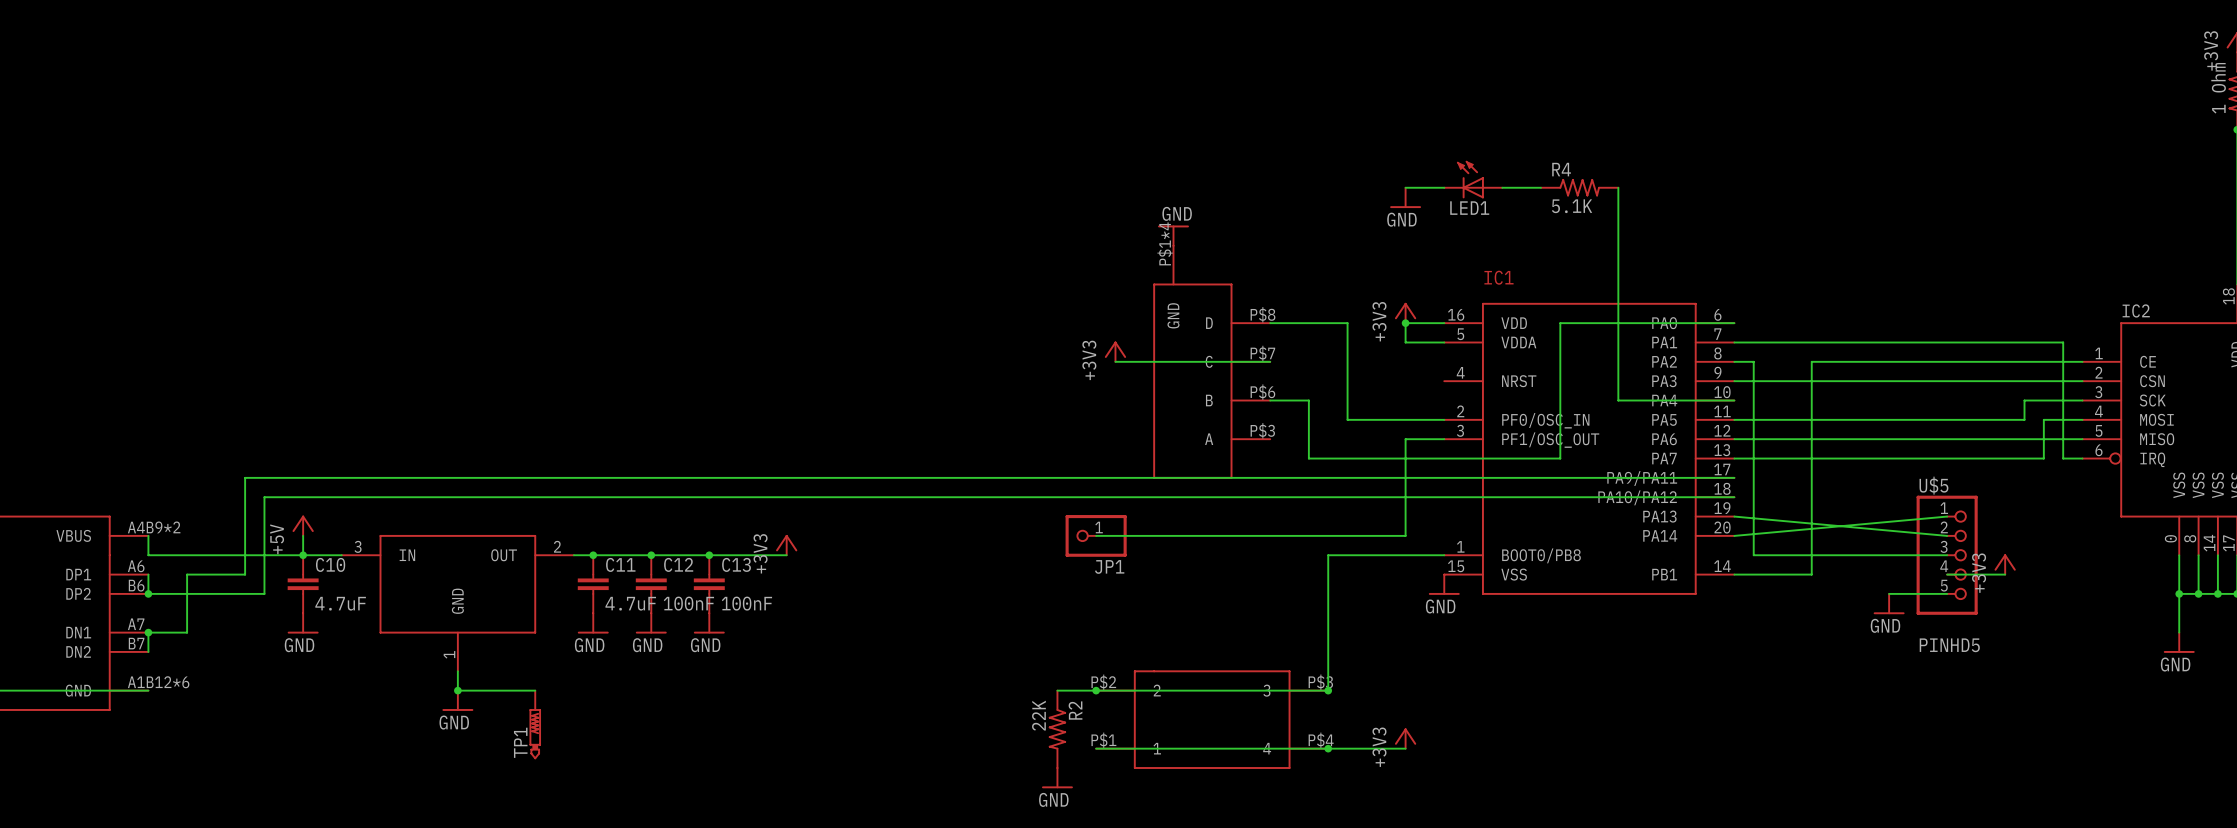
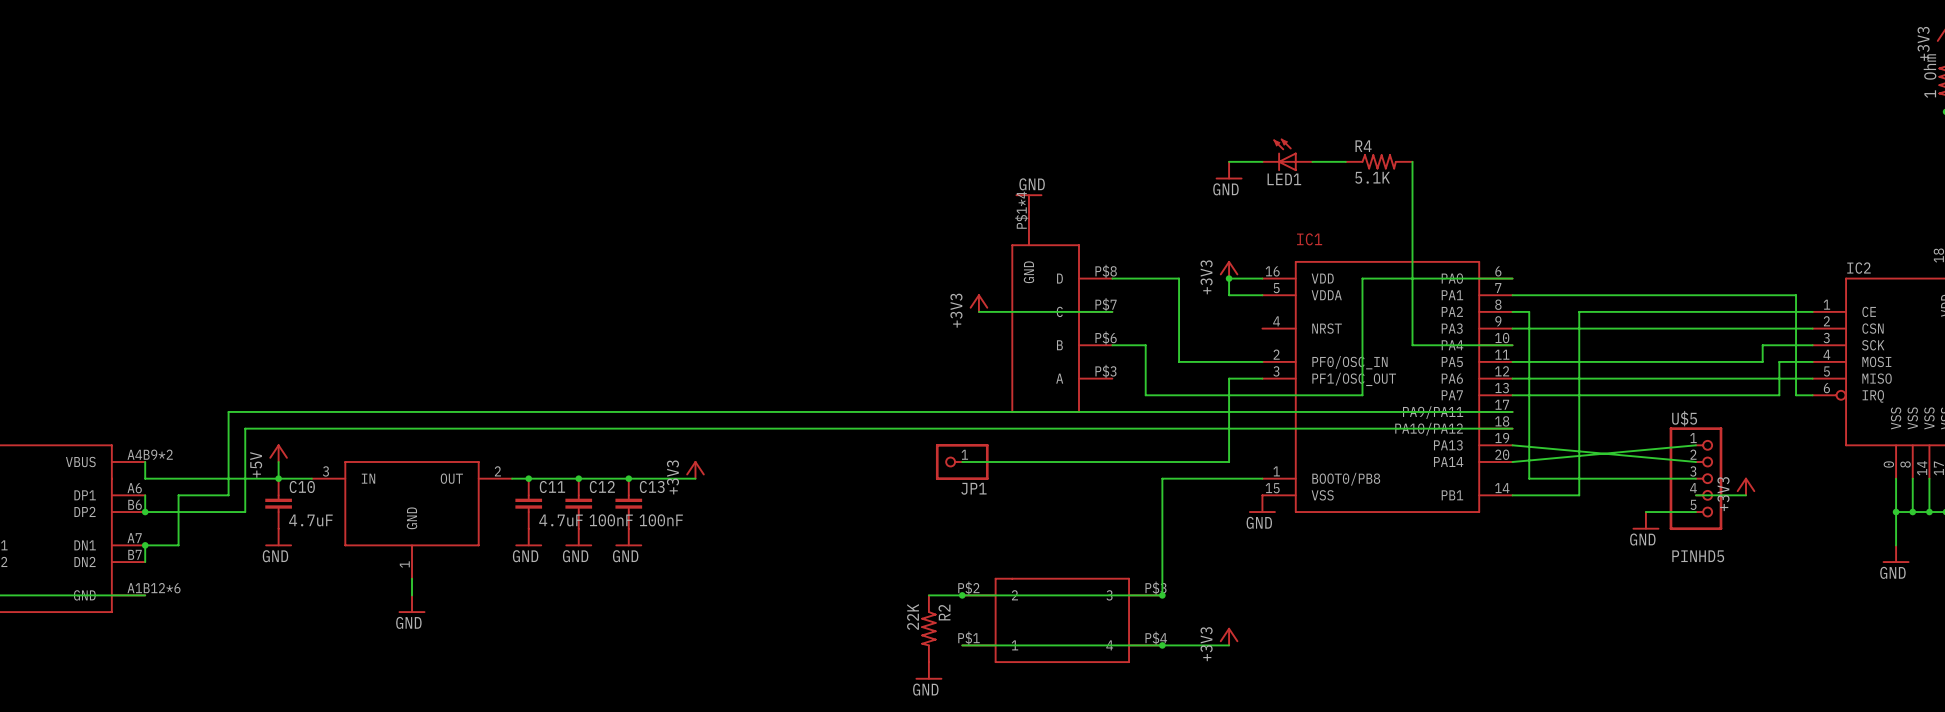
wire: (457, 690) (535, 690) -> none
junction: (457, 690) -> none
TP1: (535, 724) -> none

